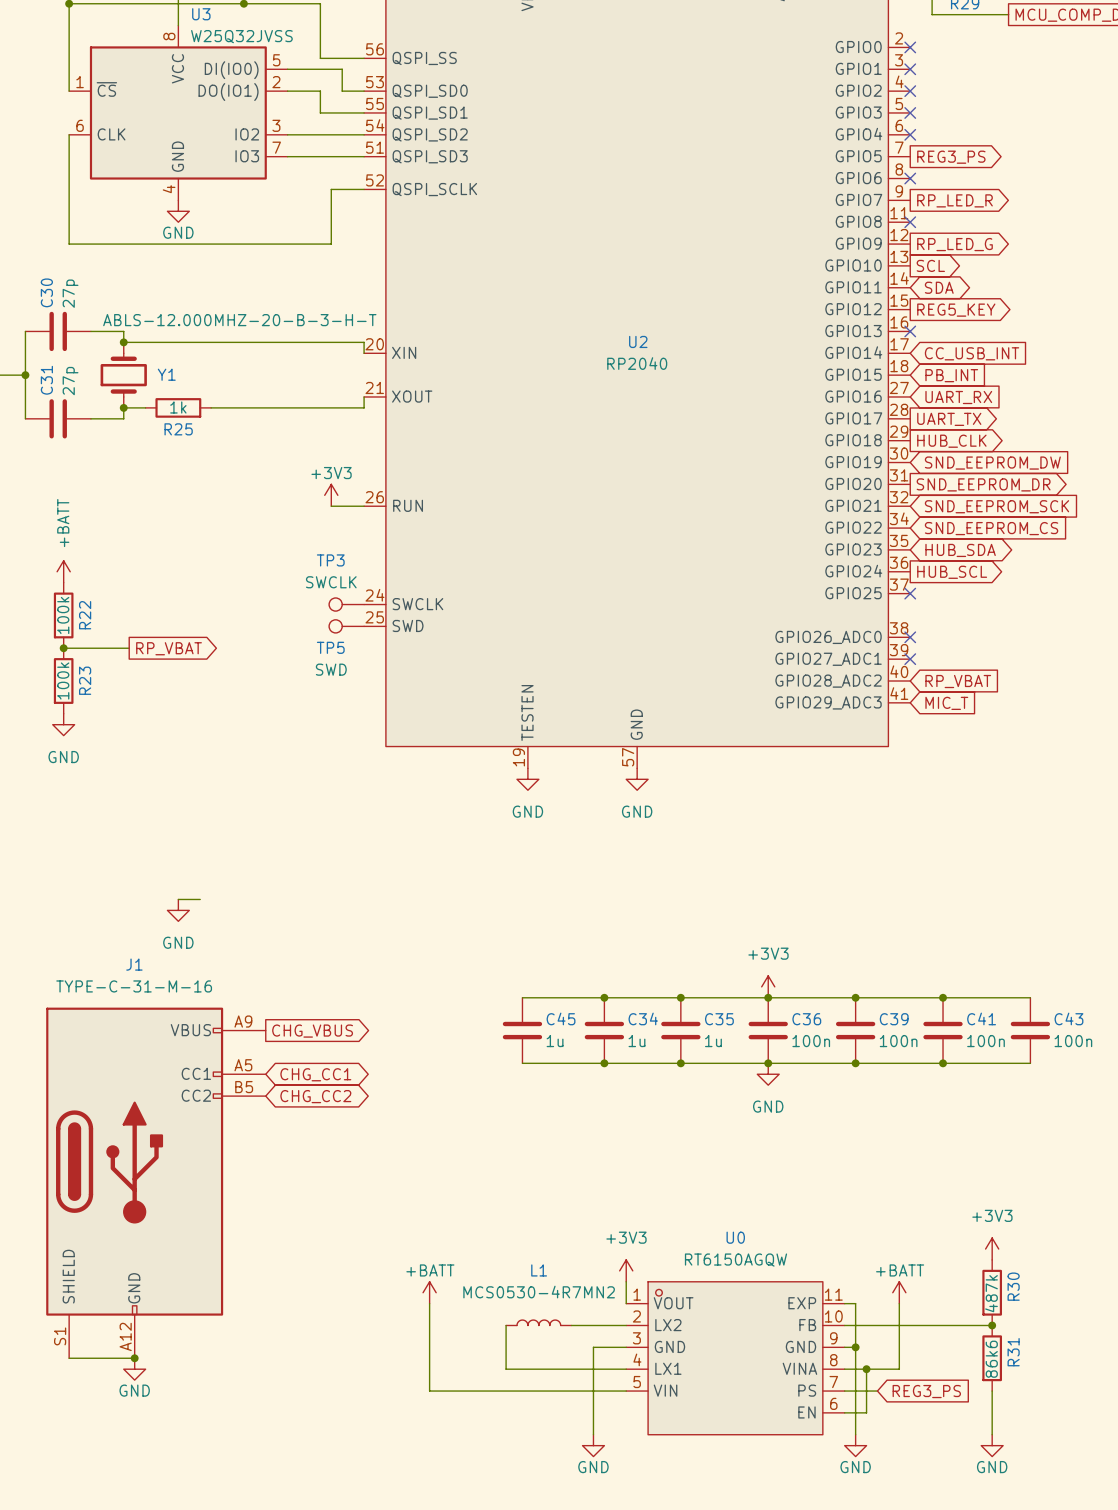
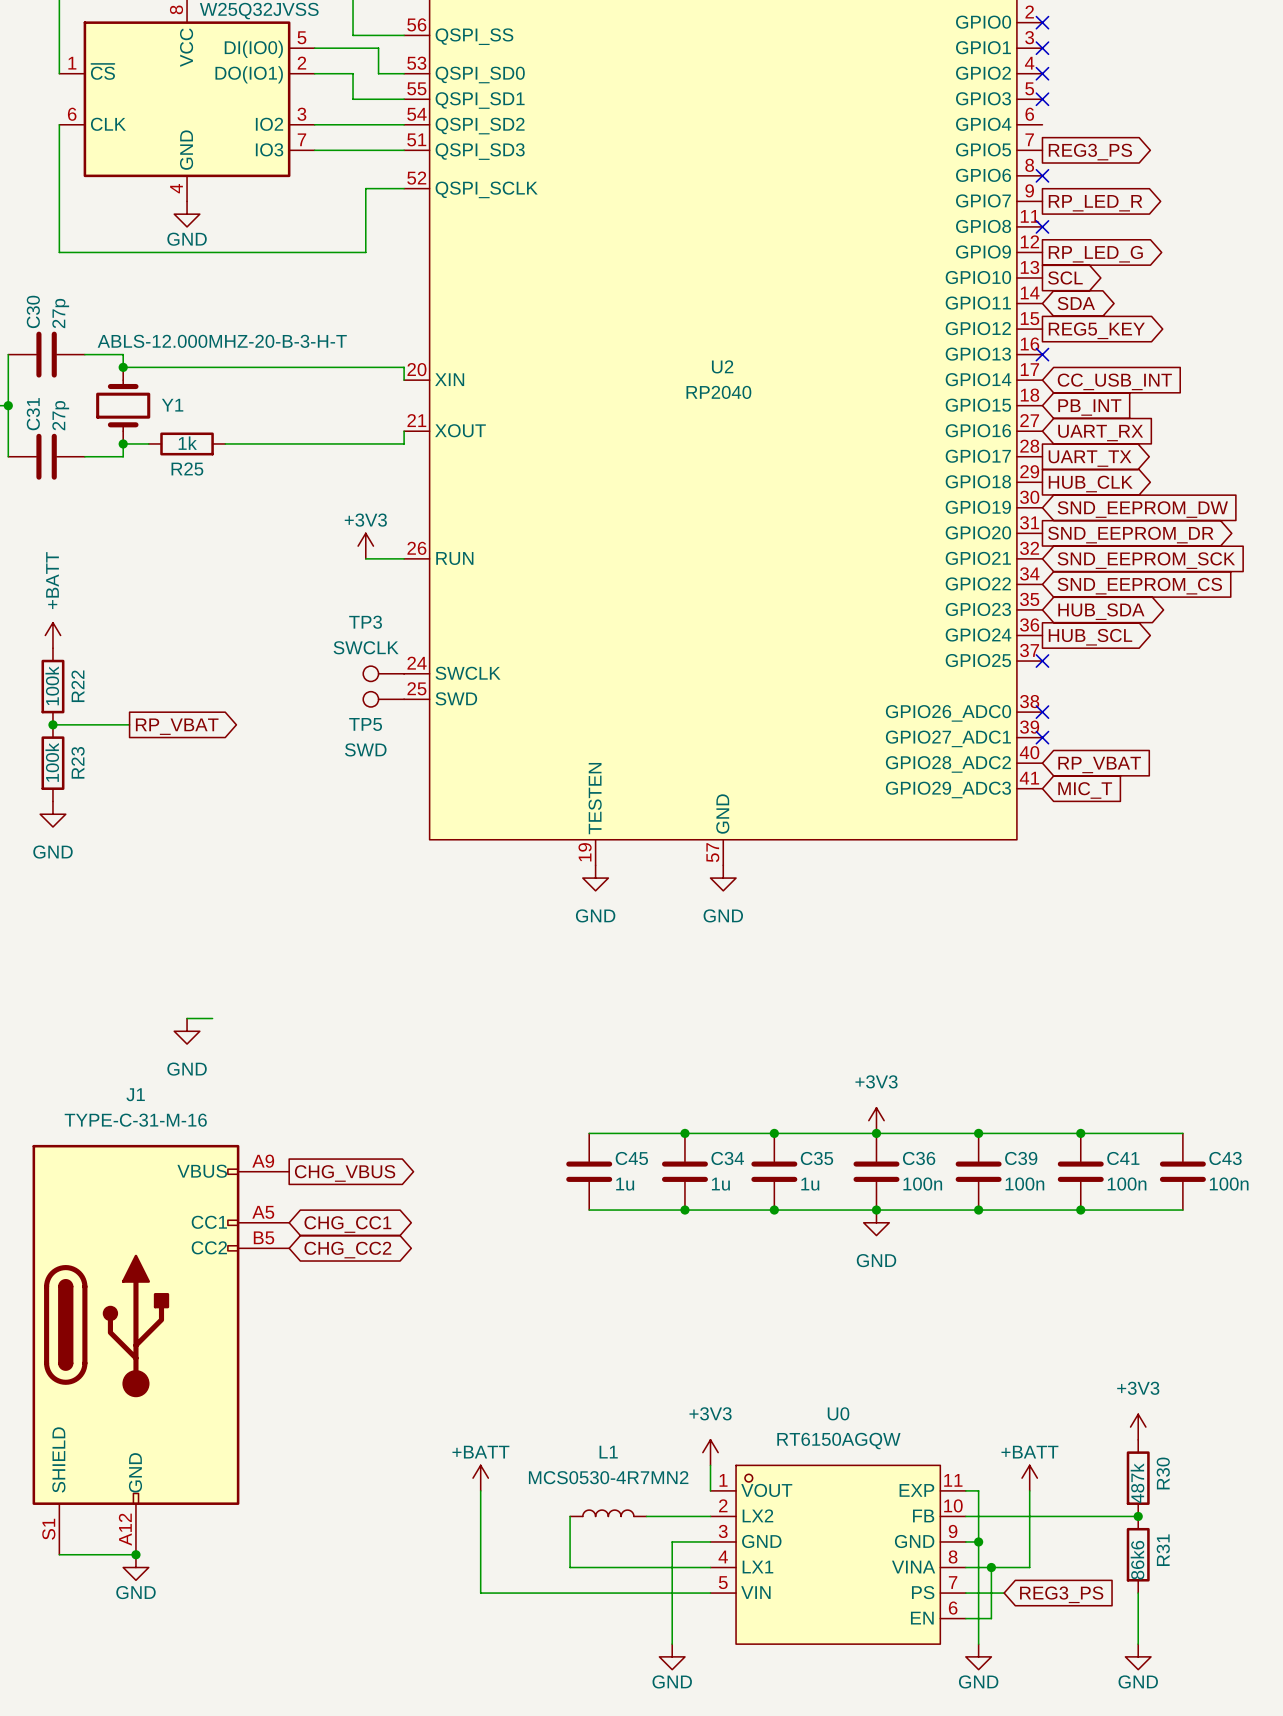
no-connect mark: (910, 134) -> none

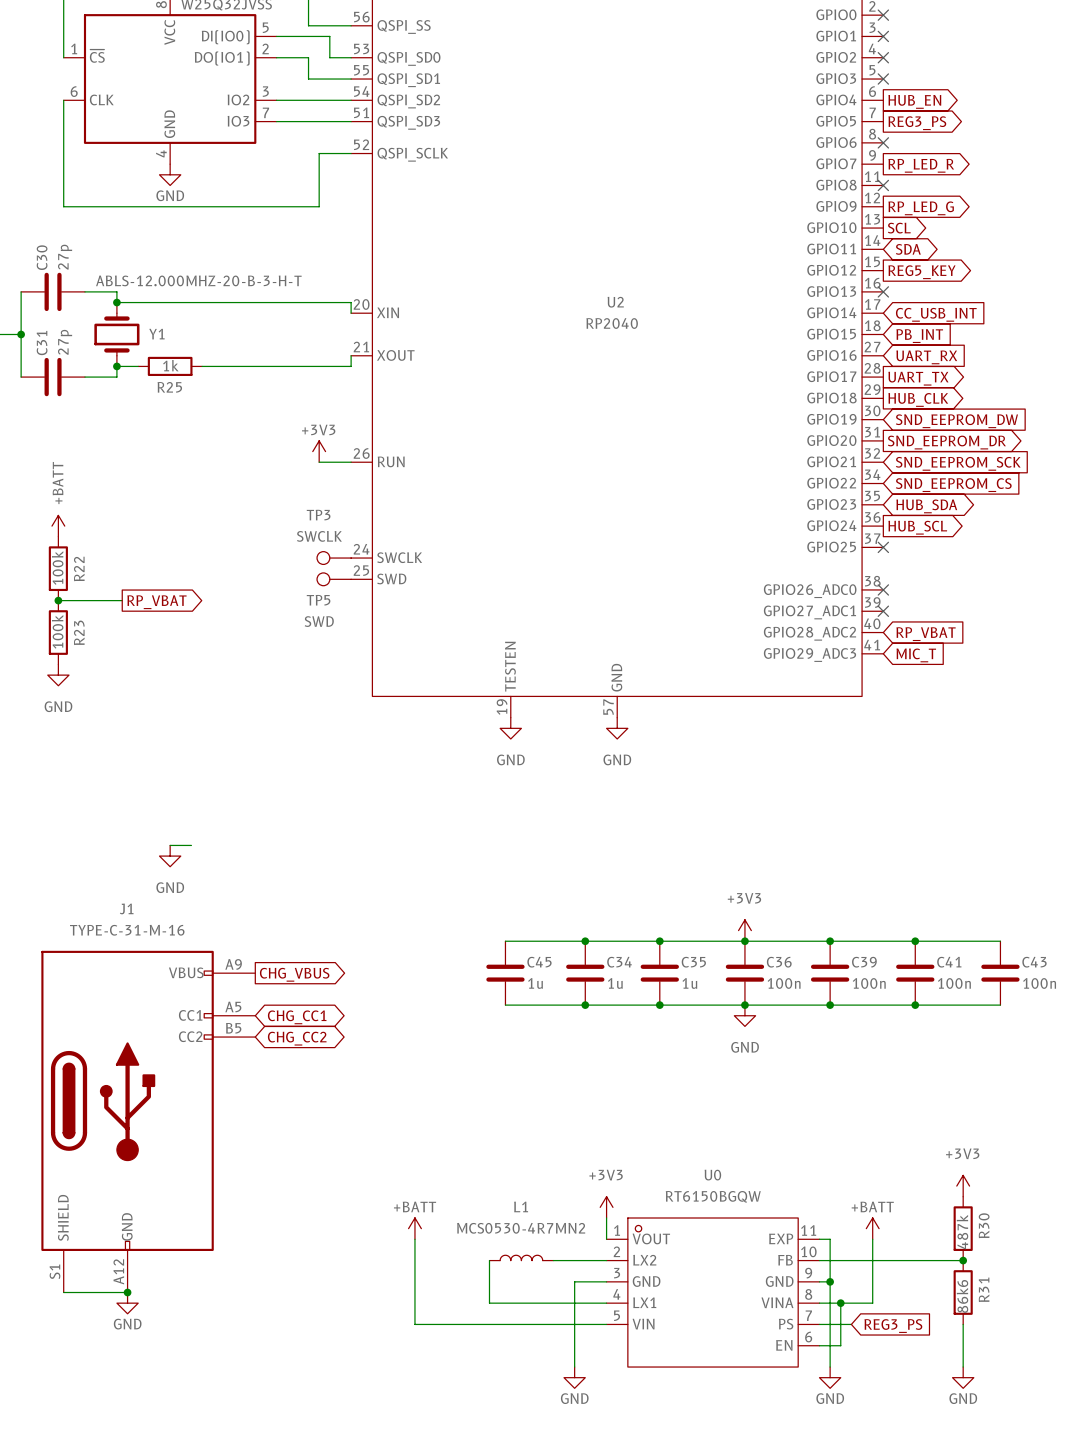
global label: none -> HUB_EN (914, 101)
U0 value: RT6150AGQW (838, 1441) -> RT6150BGQW (713, 1196)

